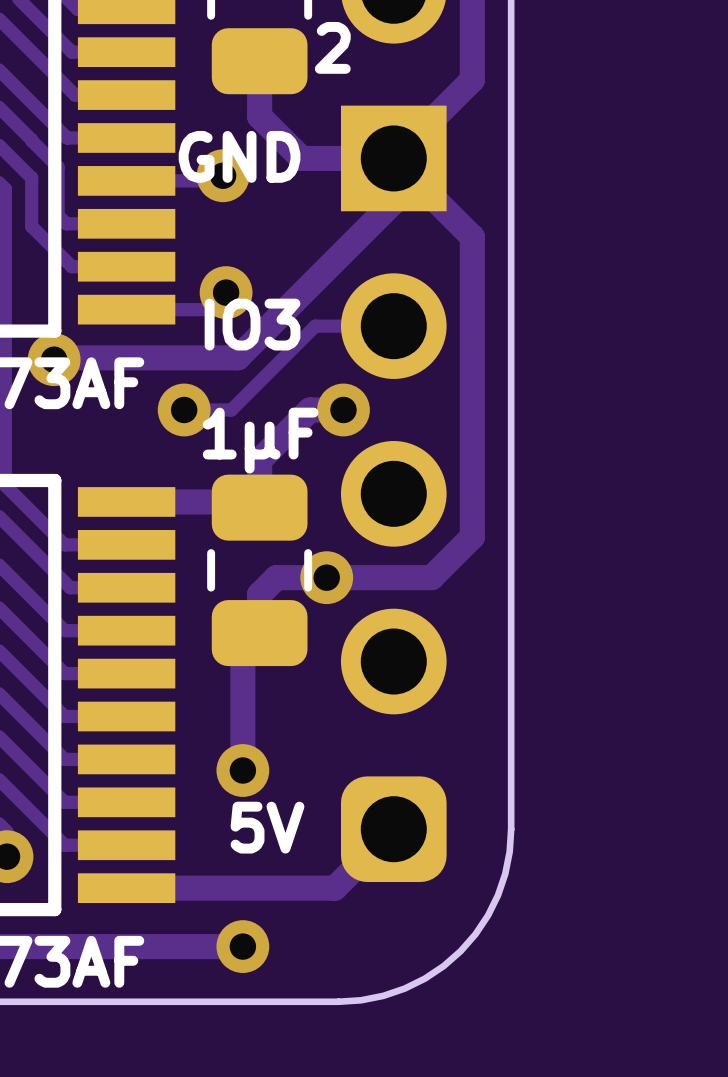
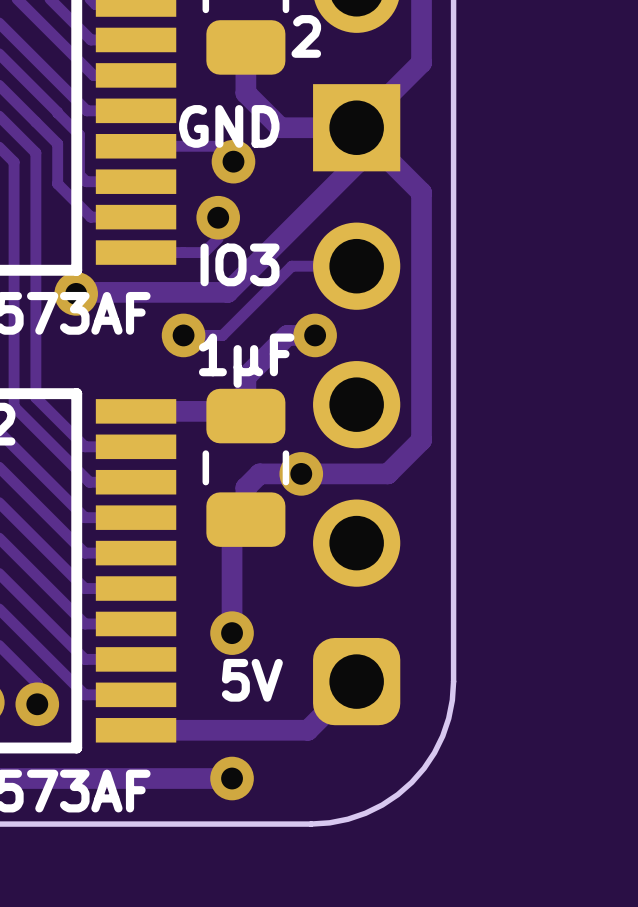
via position: (223, 175) -> (233, 161)
via position: (226, 292) -> (218, 217)

